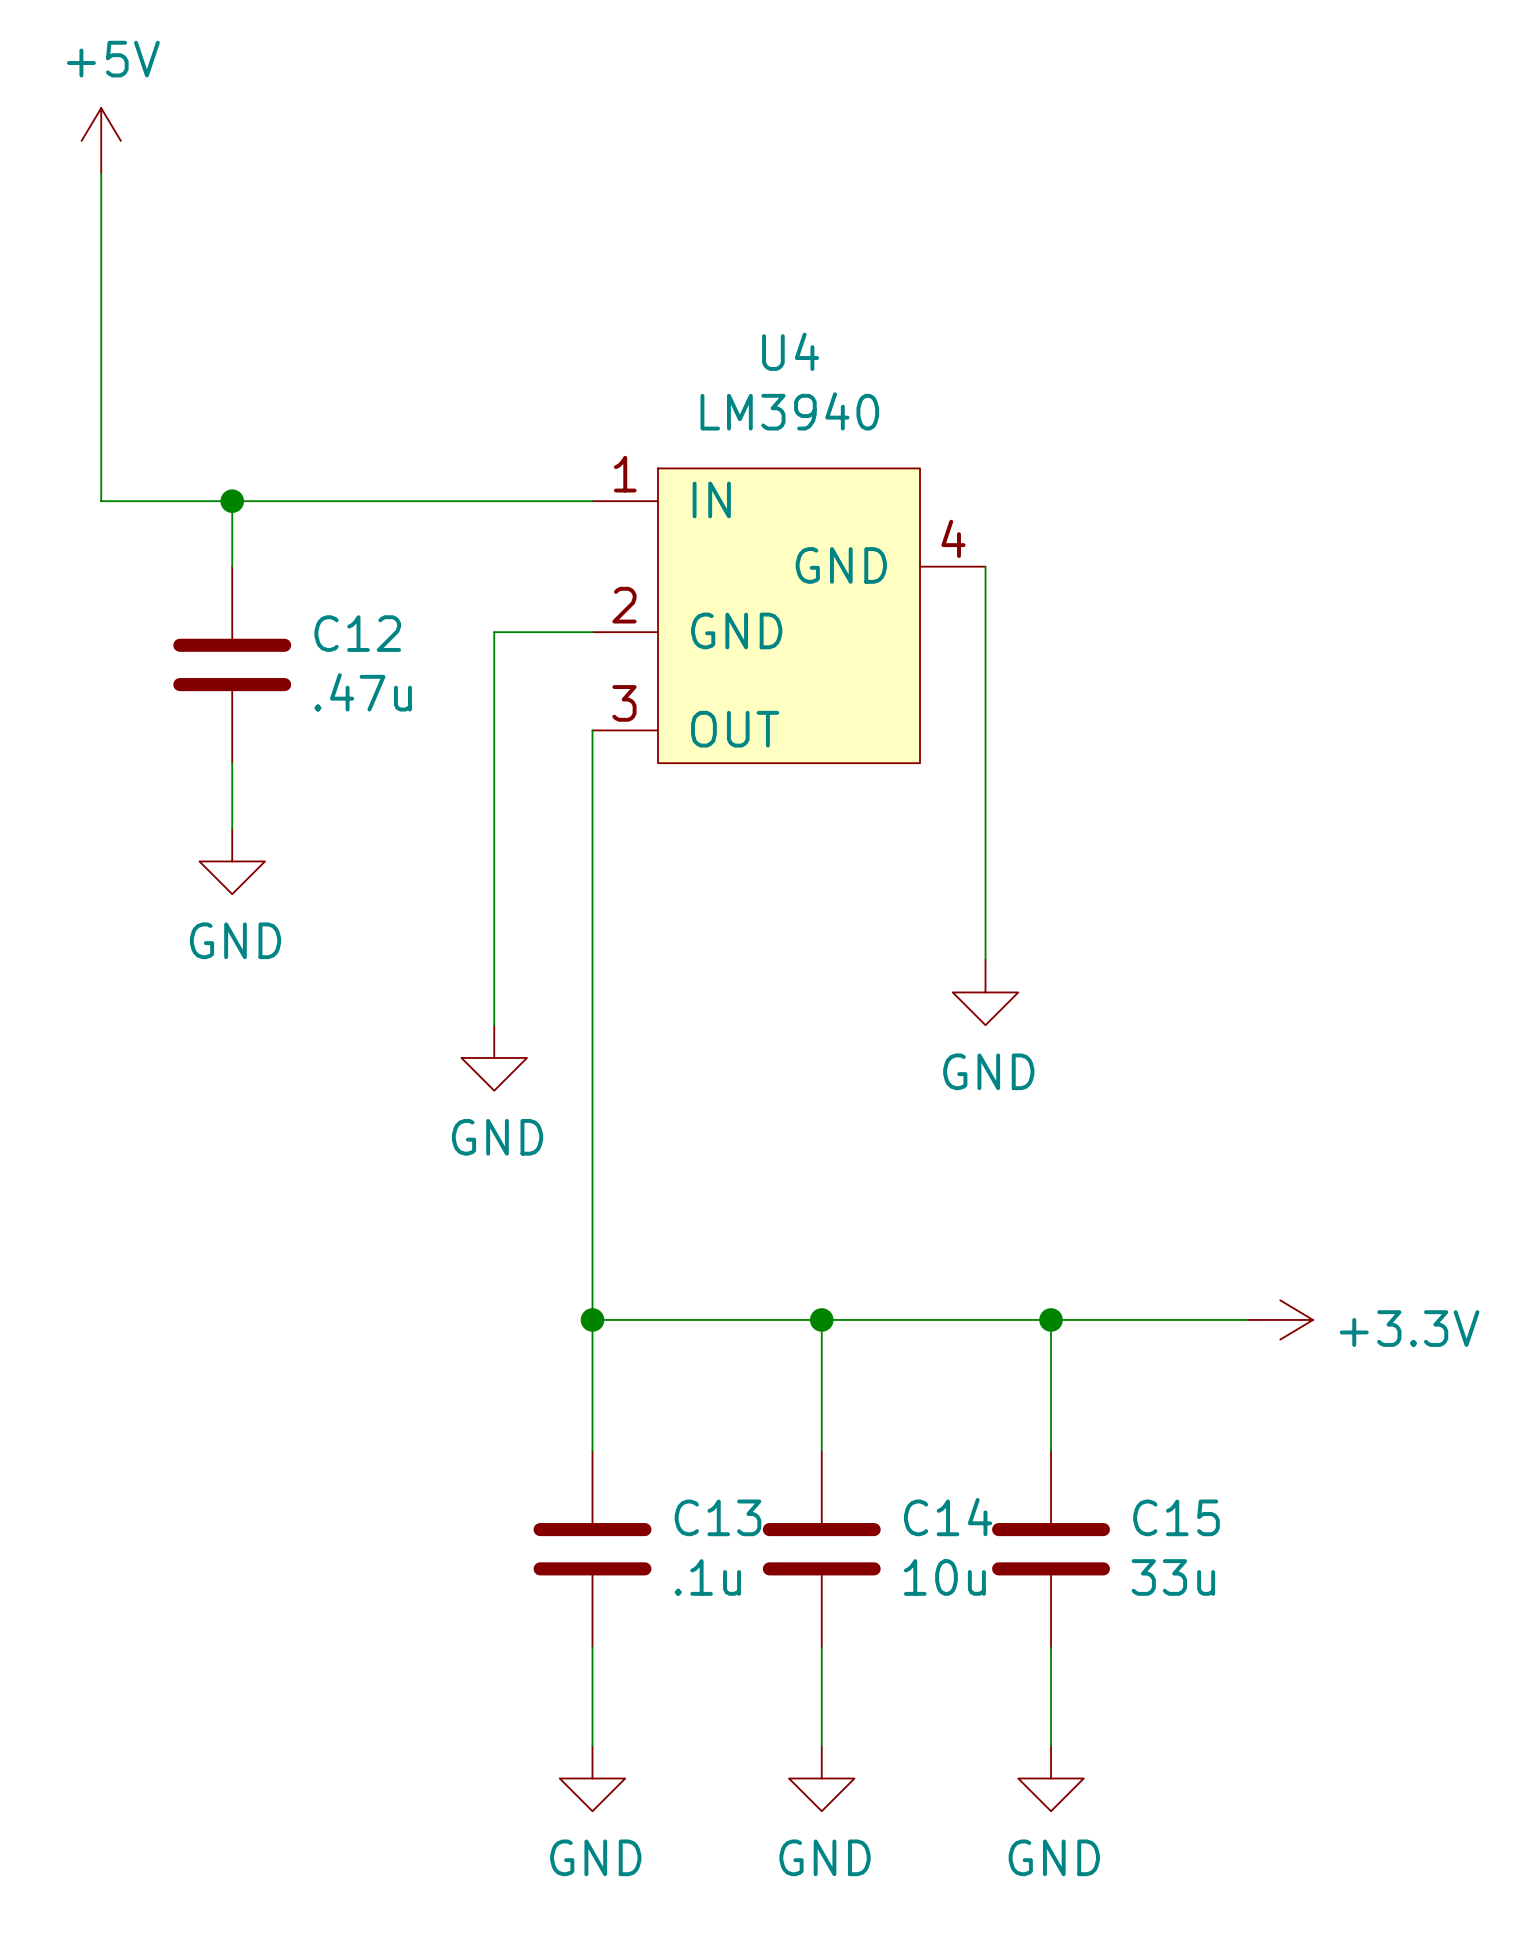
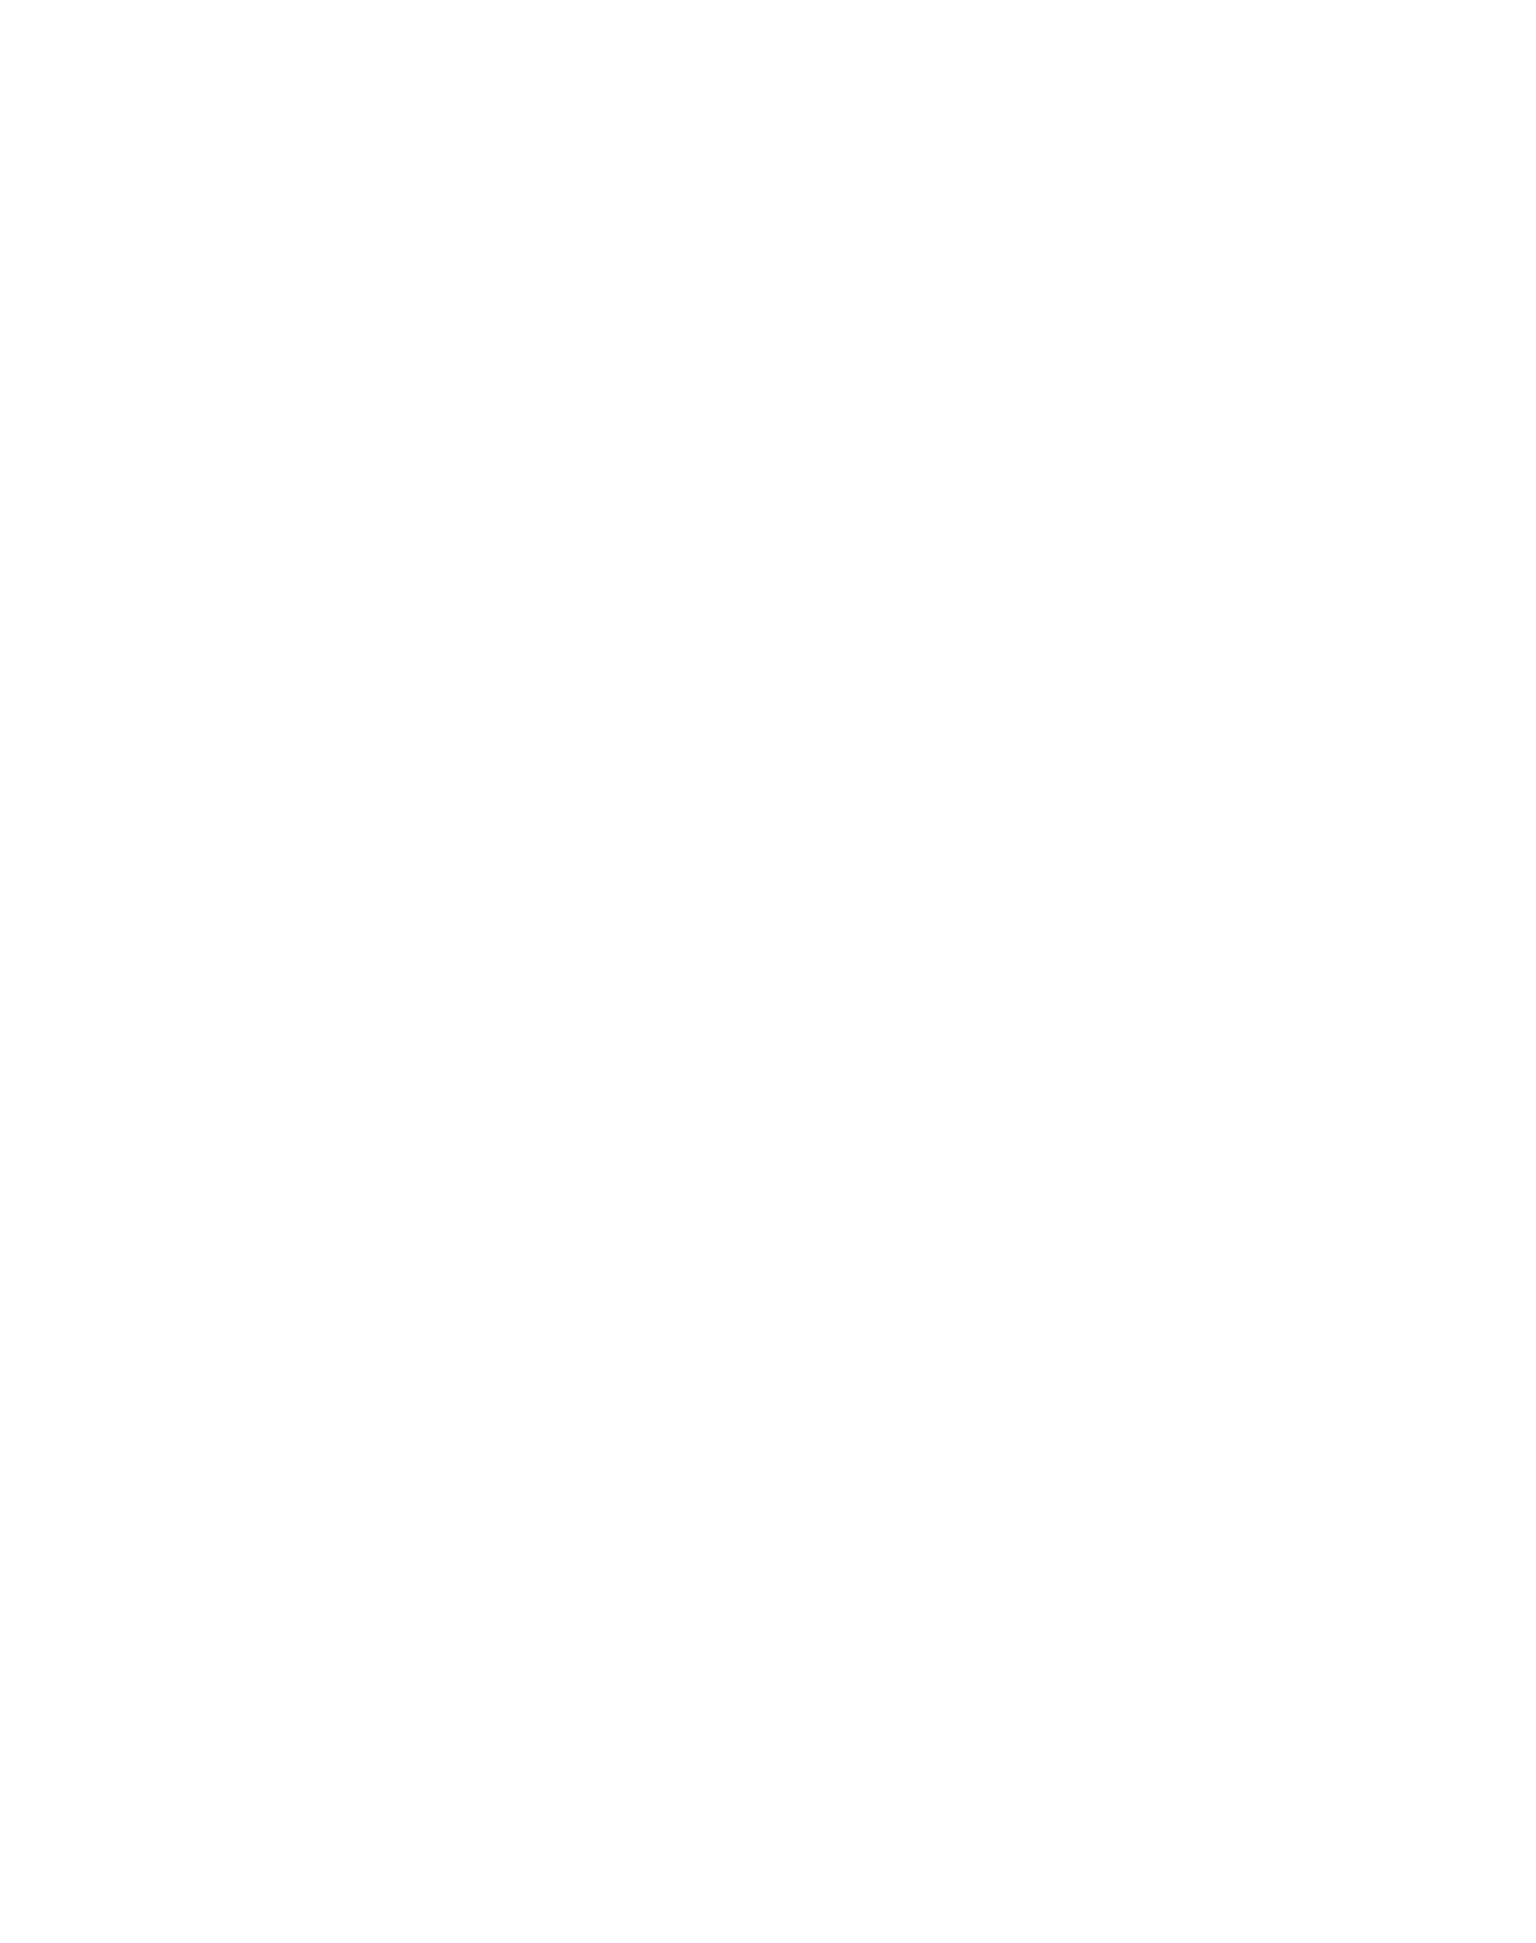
power symbol: +5V (101, 140) -> none
wire: (101, 173) (101, 501) (592, 501) -> none
wire: (232, 501) (232, 566) -> none
junction: (232, 501) -> none
wire: (985, 566) (985, 959) -> none
U4: LM3940 (789, 615) -> none
wire: (592, 632) (494, 632) (494, 1025) -> none
C12: .47u (232, 664) -> none
wire: (592, 730) (592, 1450) -> none
wire: (232, 763) (232, 828) -> none
power symbol: GND (232, 861) -> none
power symbol: GND (985, 992) -> none
power symbol: GND (494, 1057) -> none
wire: (592, 1319) (1247, 1319) -> none
junction: (592, 1319) -> none
wire: (821, 1319) (821, 1450) -> none
junction: (821, 1319) -> none
wire: (1051, 1319) (1051, 1450) -> none
junction: (1051, 1319) -> none
power symbol: +3.3V (1280, 1319) -> none
C13: .1u (592, 1549) -> none
C14: 10u (821, 1549) -> none
C15: 33u (1051, 1549) -> none
wire: (592, 1647) (592, 1745) -> none
wire: (821, 1647) (821, 1745) -> none
wire: (1051, 1647) (1051, 1745) -> none
power symbol: GND (592, 1778) -> none
power symbol: GND (821, 1778) -> none
power symbol: GND (1051, 1778) -> none

